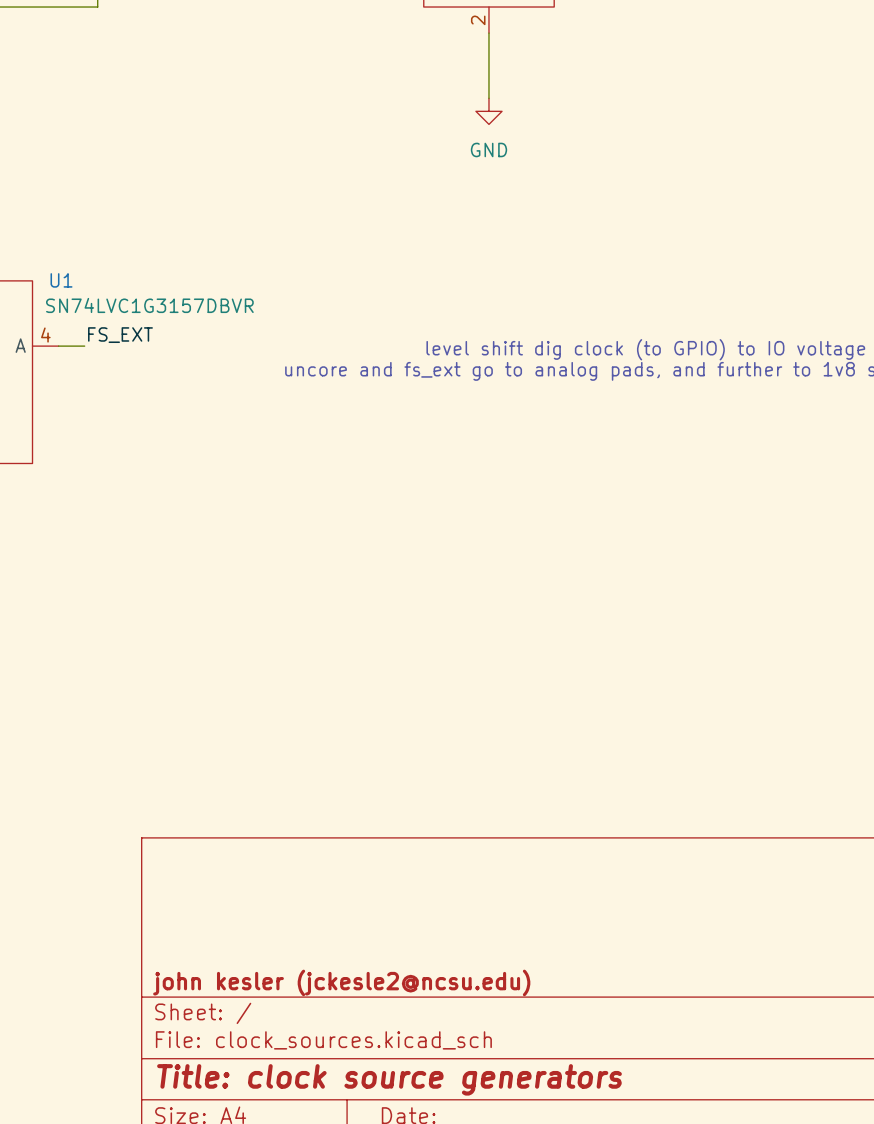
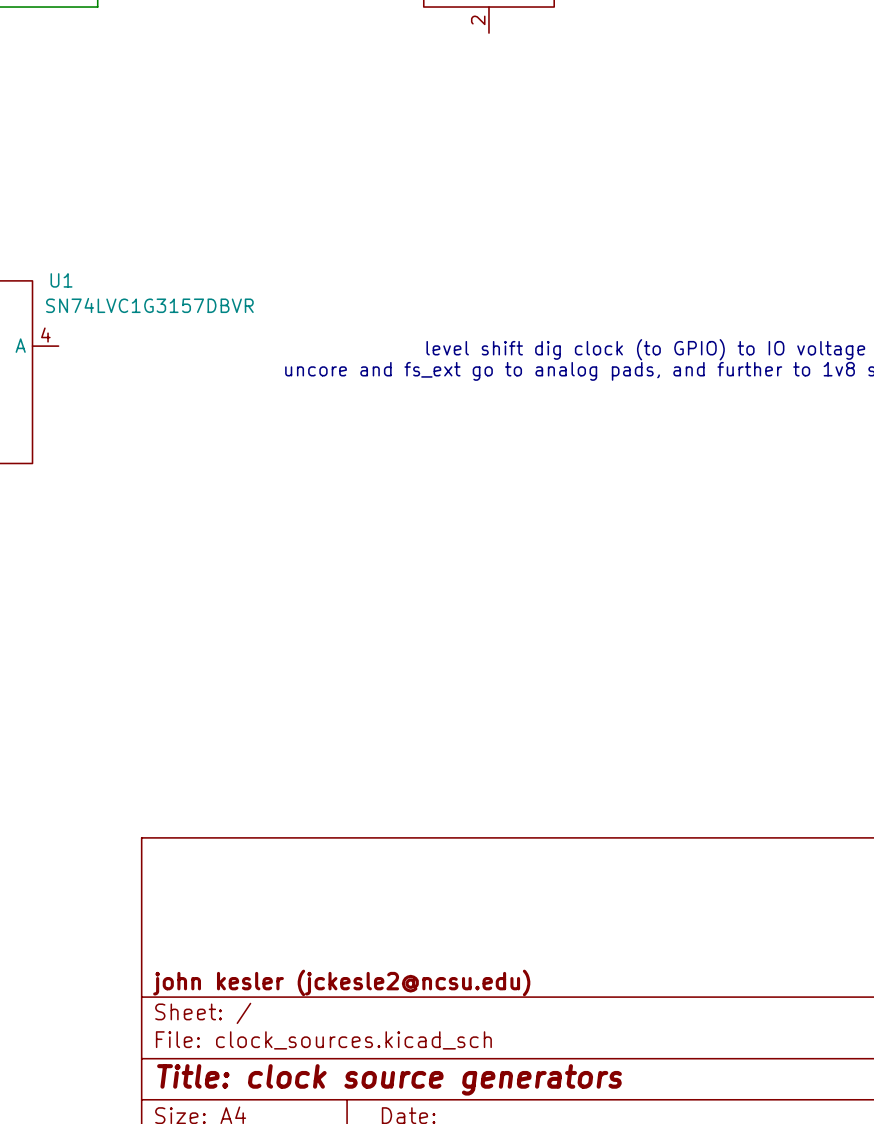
wire: (488, 33) (488, 98) -> none
power symbol: GND (488, 111) -> none
label: FS_EXT (120, 335) -> none
wire: (58, 346) (84, 346) -> none

